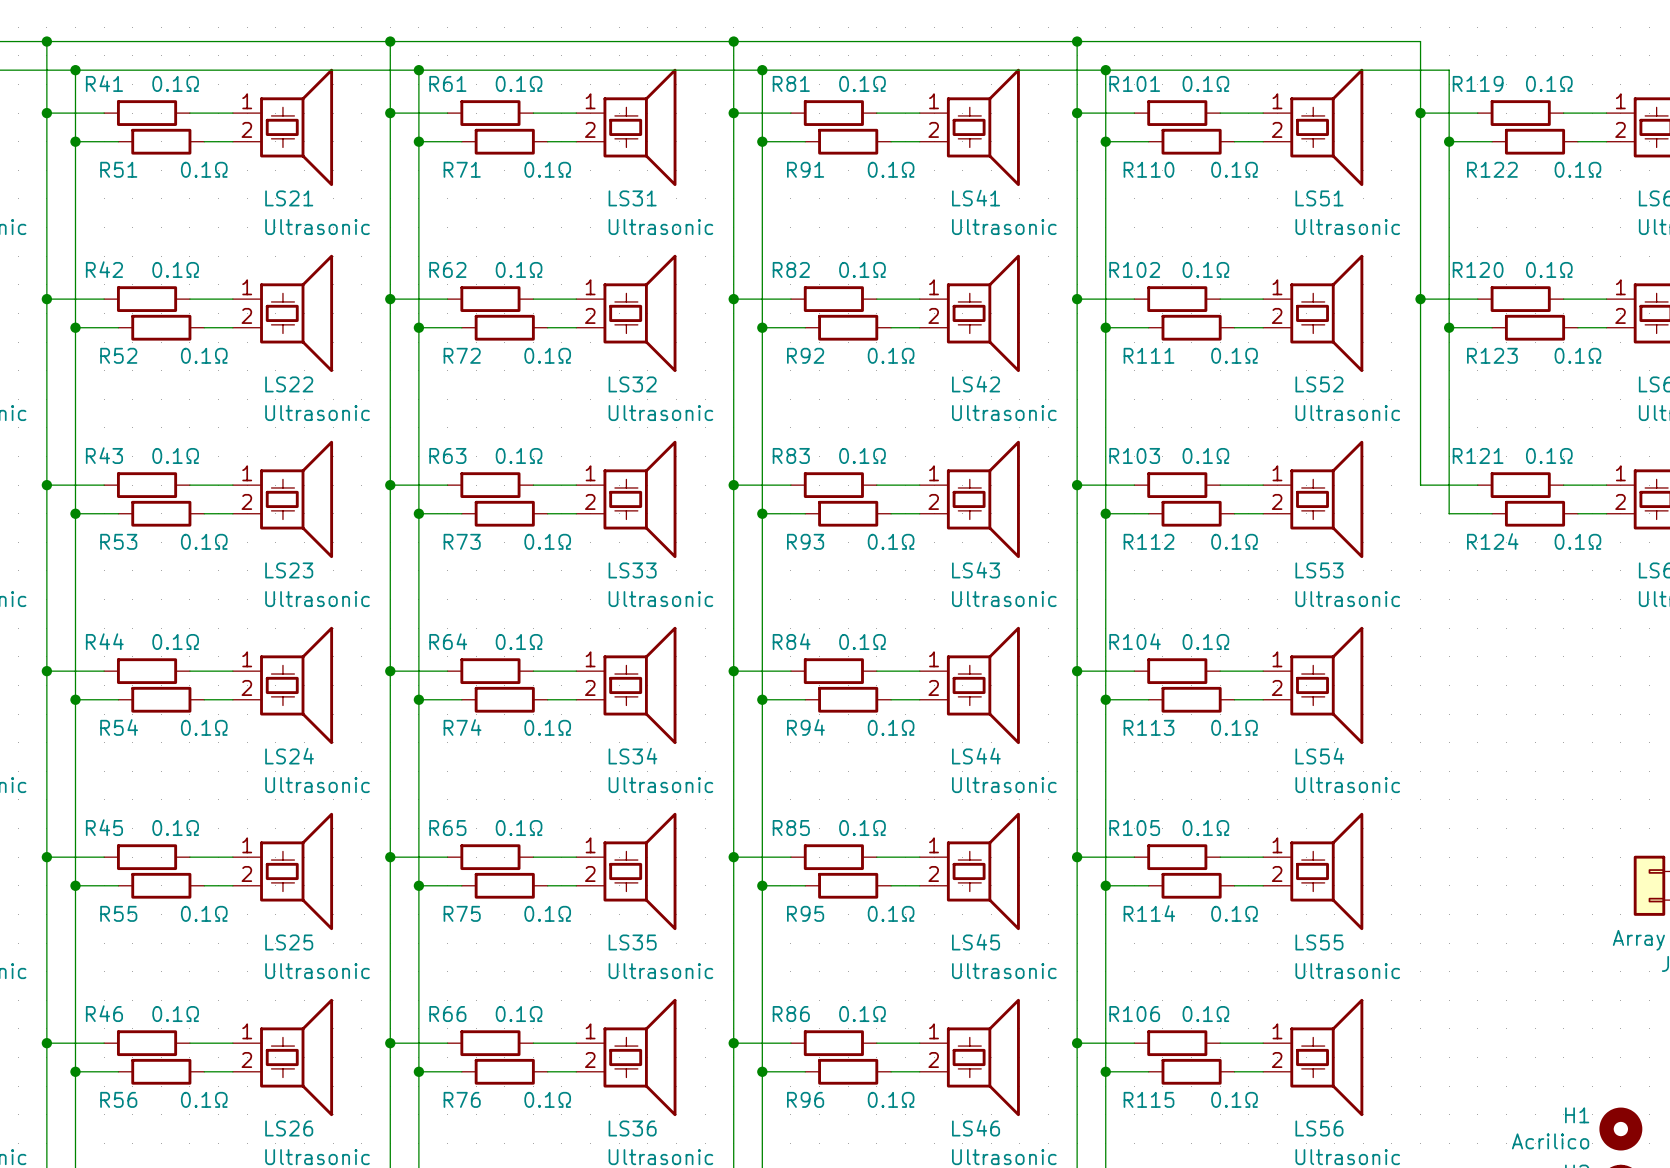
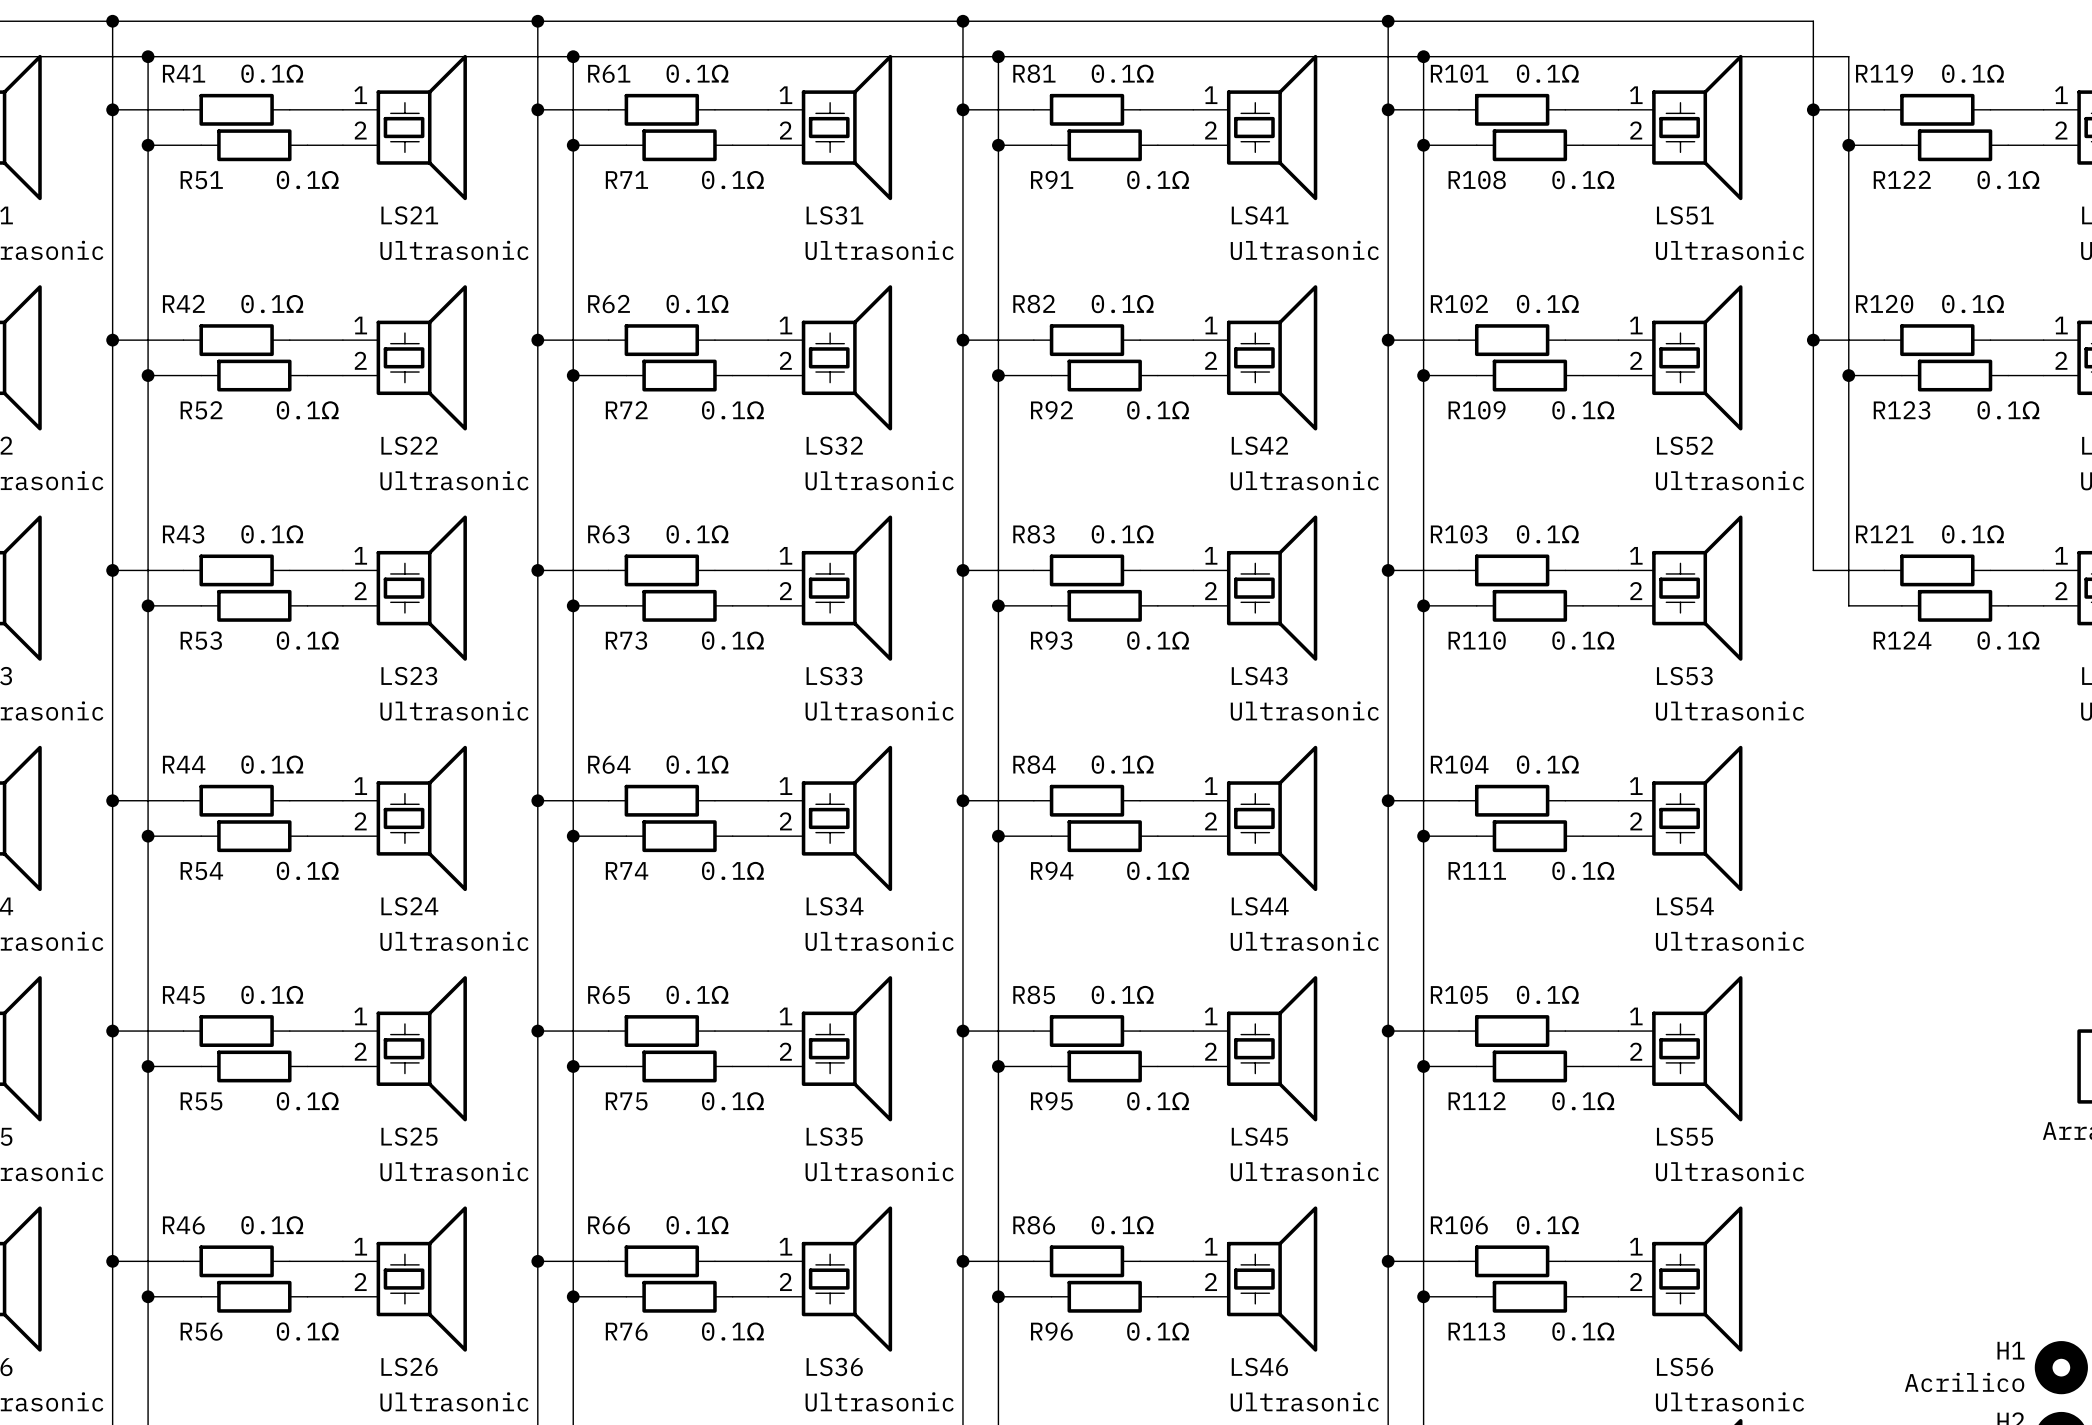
R110 name: R110 (1149, 169) -> R108 (1477, 180)
R111 name: R111 (1149, 355) -> R109 (1477, 410)
R112 name: R112 (1149, 541) -> R110 (1477, 640)
R113 name: R113 (1149, 727) -> R111 (1477, 870)
R114 name: R114 (1149, 913) -> R112 (1477, 1101)
R115 name: R115 (1149, 1099) -> R113 (1476, 1331)

